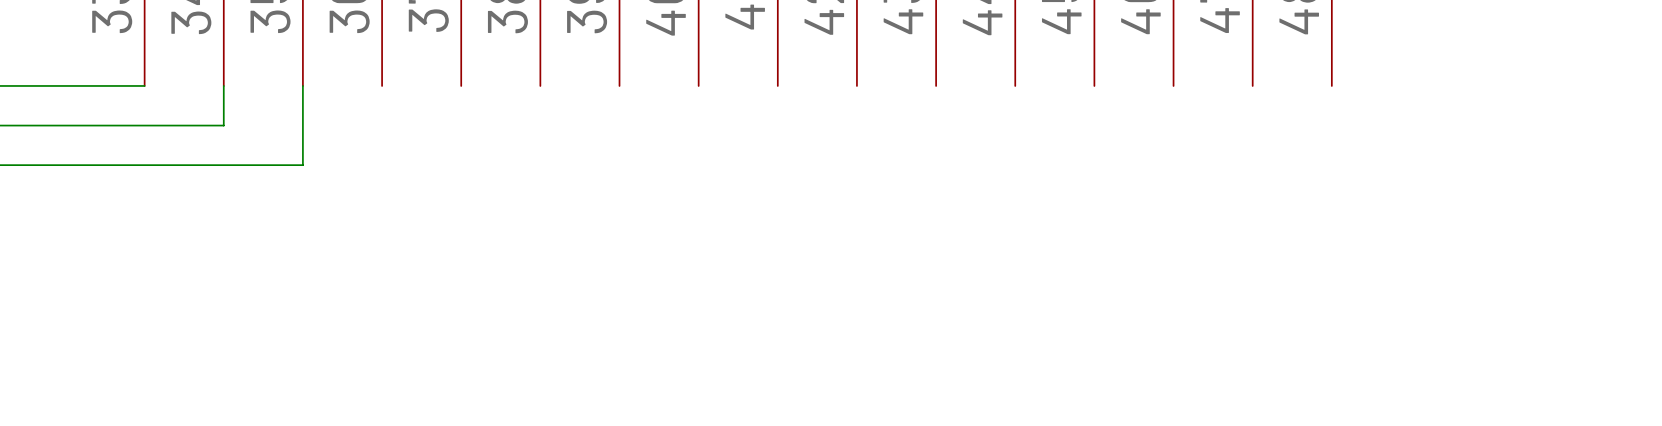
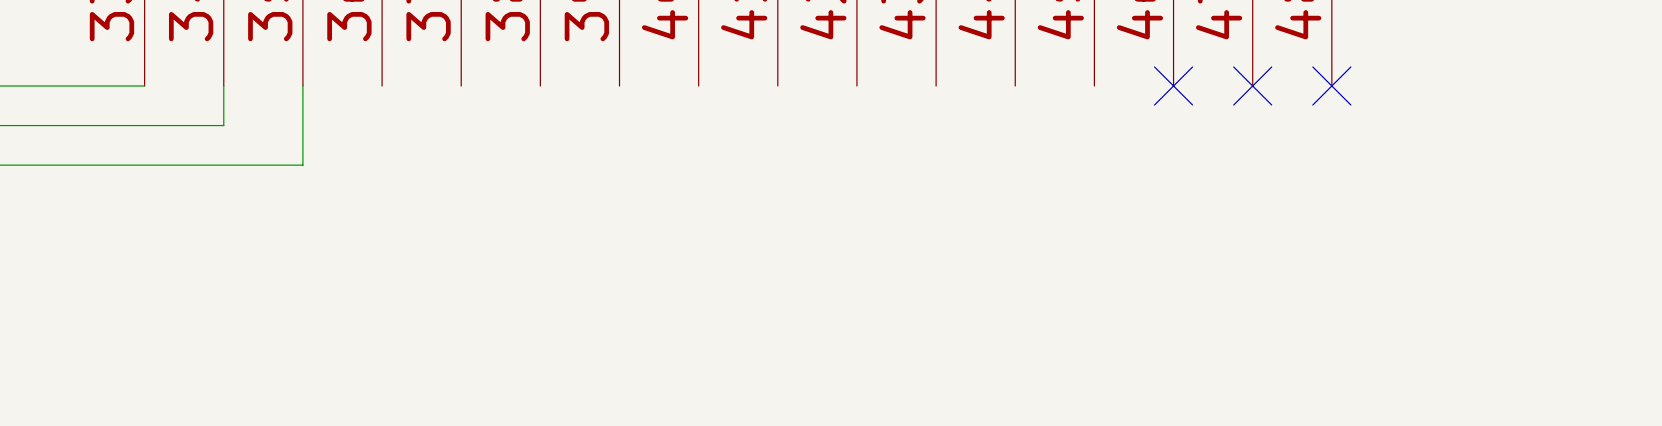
no-connect mark: none -> (1173, 85)
no-connect mark: none -> (1252, 85)
no-connect mark: none -> (1331, 85)

